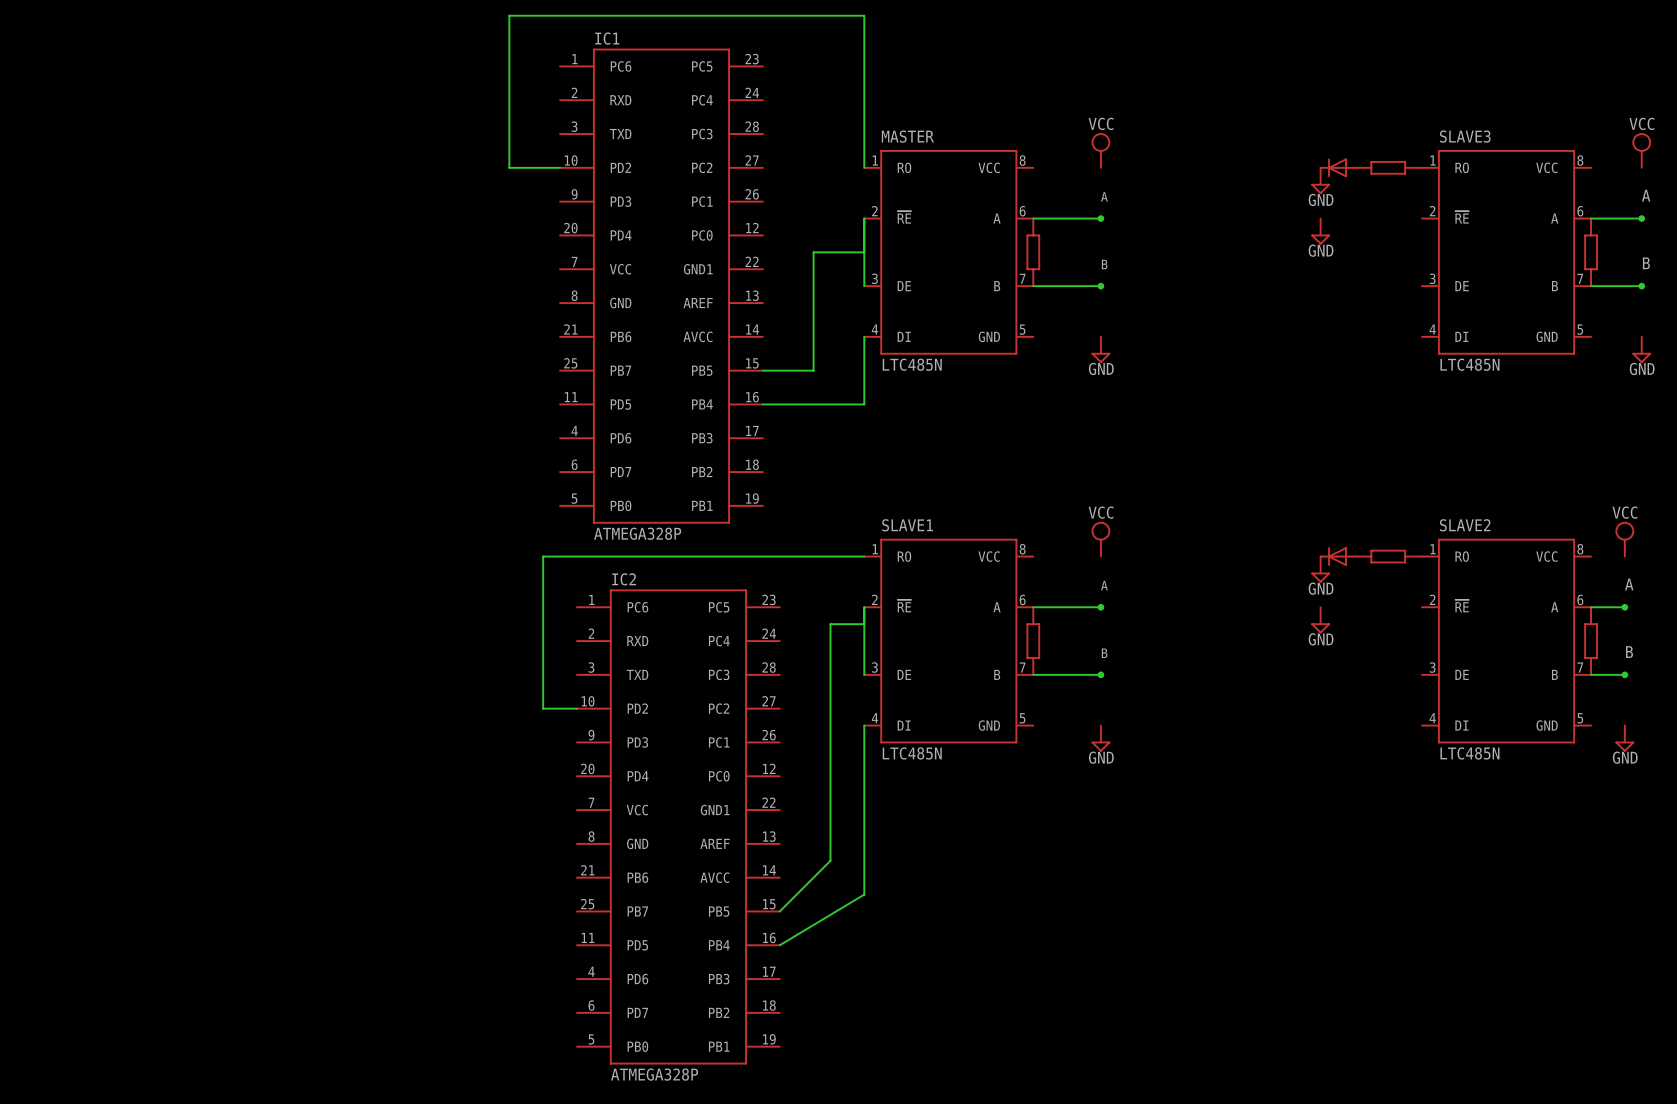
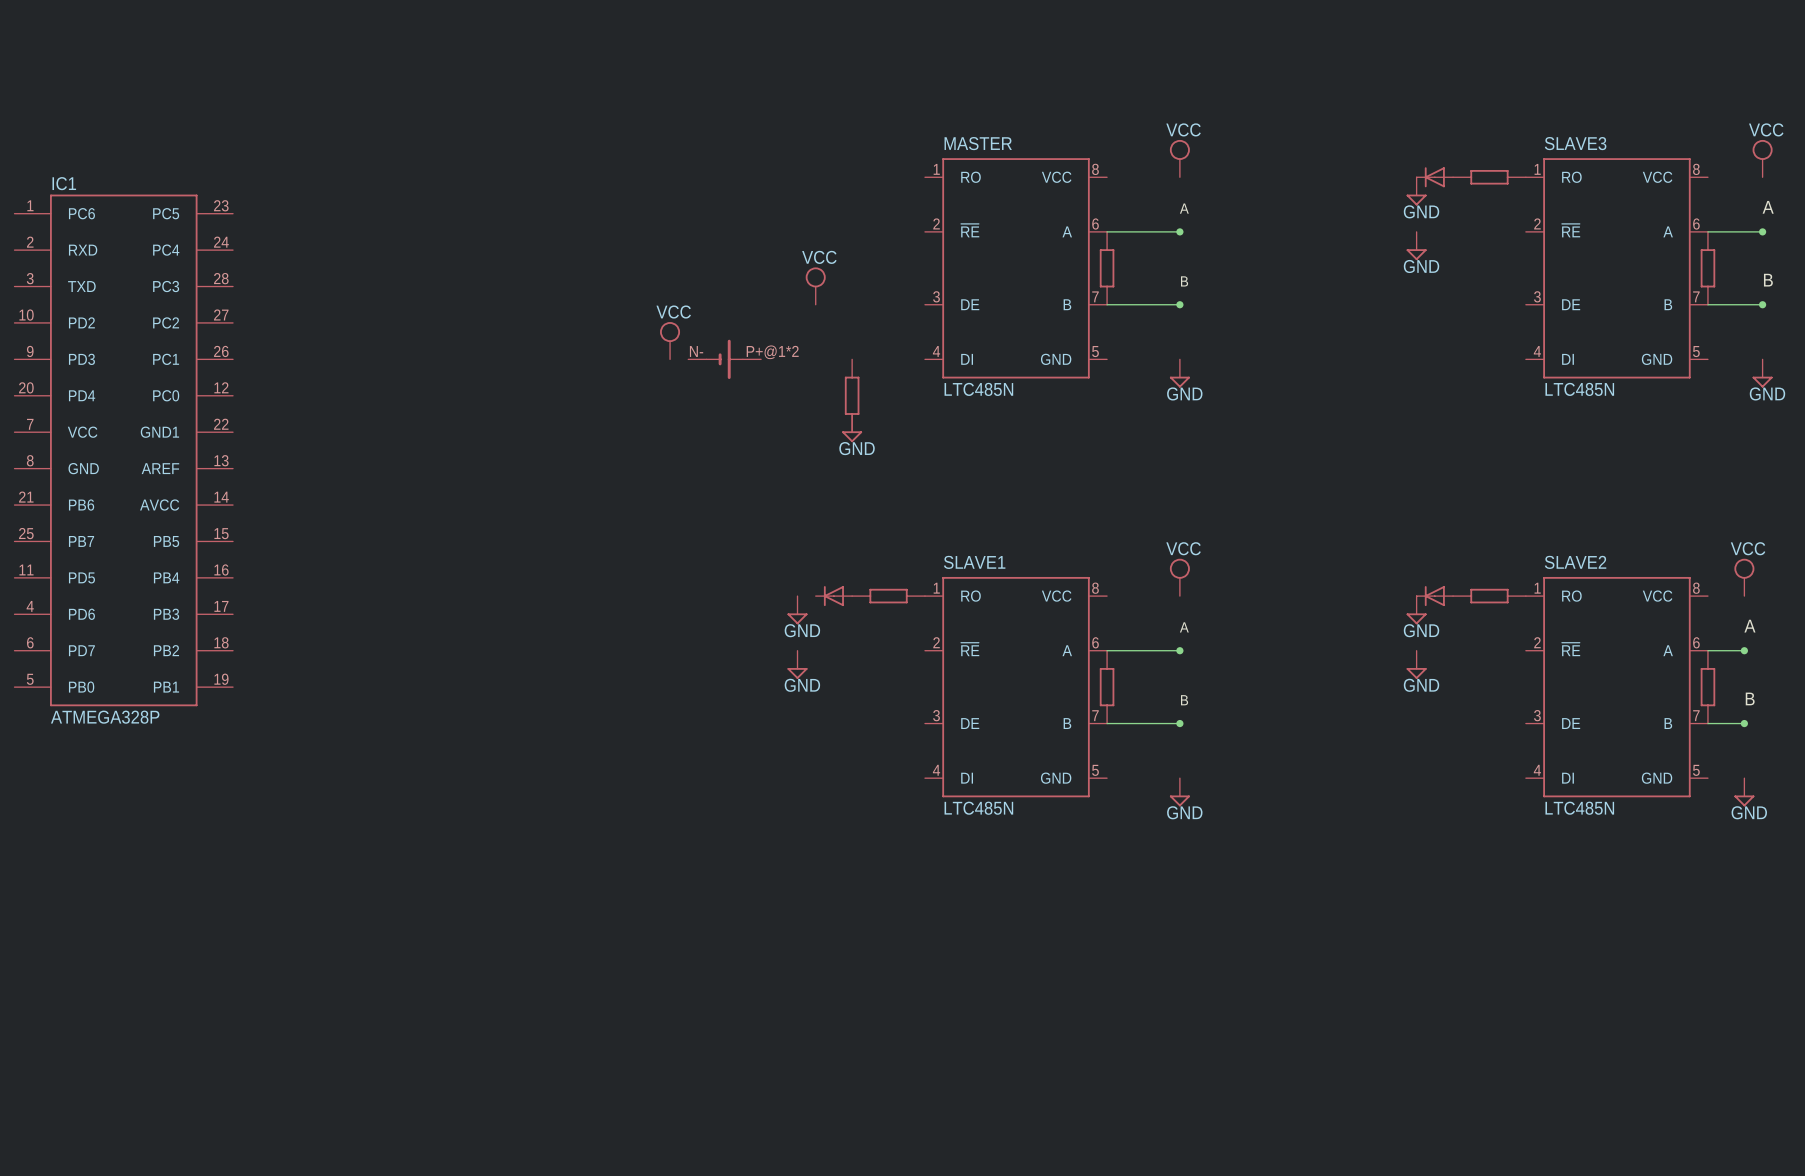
wire: (560, 167) (509, 167) (509, 15) (864, 15) (864, 167) -> none
wire: (864, 218) (864, 286) -> none
wire: (864, 252) (813, 252) (813, 370) (762, 370) -> none
power symbol: none -> VCC (815, 286)
IC1 position: (661, 286) -> (123, 450)
power symbol: none -> VCC (670, 340)
part: none -> (724, 359)
wire: (864, 336) (864, 404) (762, 404) -> none
part: none -> (852, 395)
power symbol: none -> GND (852, 428)
part: none -> (833, 596)
part: none -> (888, 596)
wire: (864, 556) (543, 556) (543, 708) (576, 708) -> none
power symbol: none -> GND (797, 610)
wire: (864, 607) (864, 674) -> none
power symbol: none -> GND (797, 664)
wire: (864, 624) (830, 624) (830, 860) (779, 911) -> none
wire: (864, 725) (864, 894) (779, 945) -> none
IC2: ATMEGA328P (678, 826) -> none

